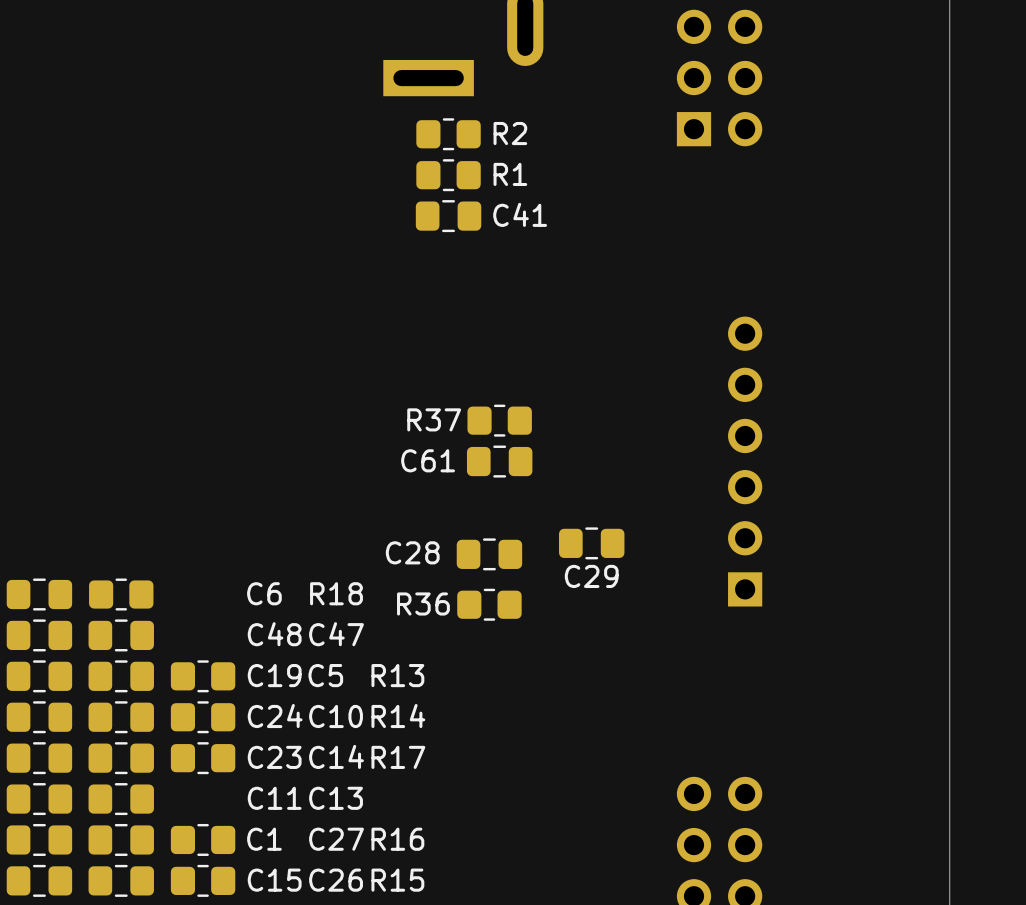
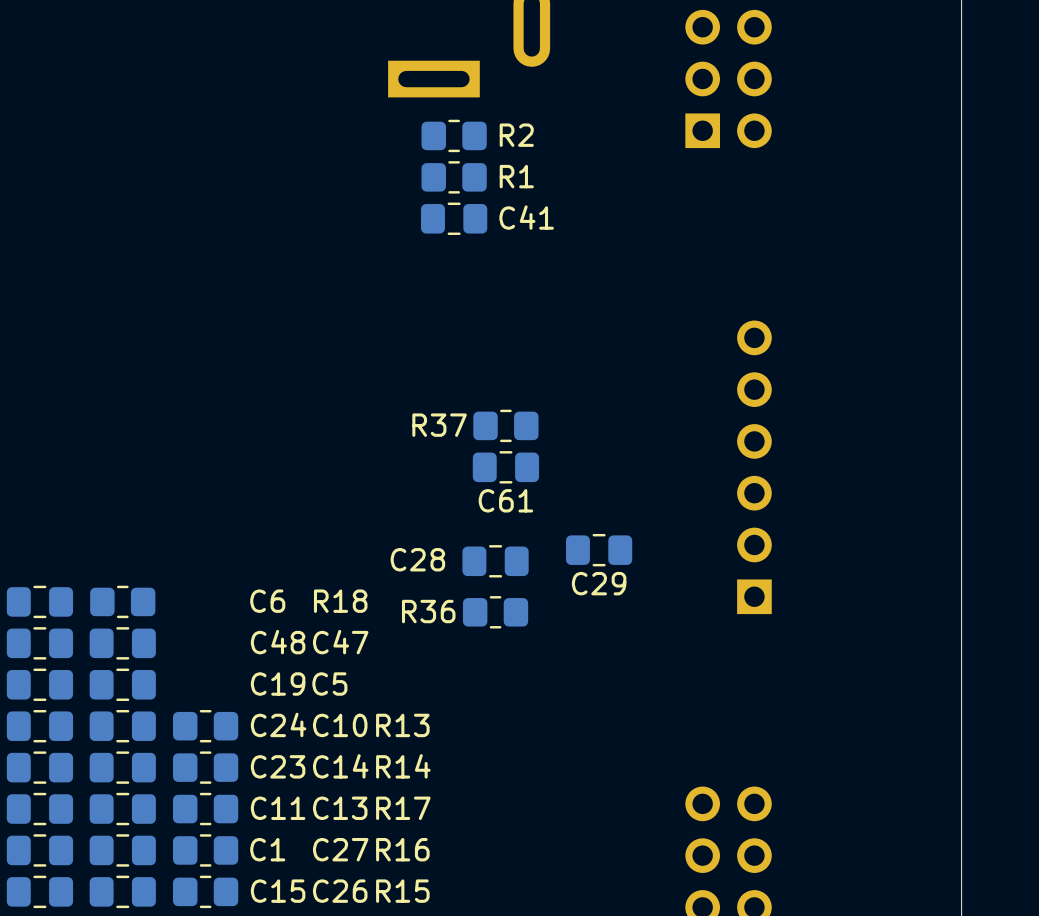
C61 name position: C61 (428, 460) -> C61 (505, 500)
R13: (203, 676) -> none
R14 name: R14 (398, 716) -> R13 (402, 725)
R17 name: R17 (398, 757) -> R14 (403, 766)
R17: none -> (205, 809)

